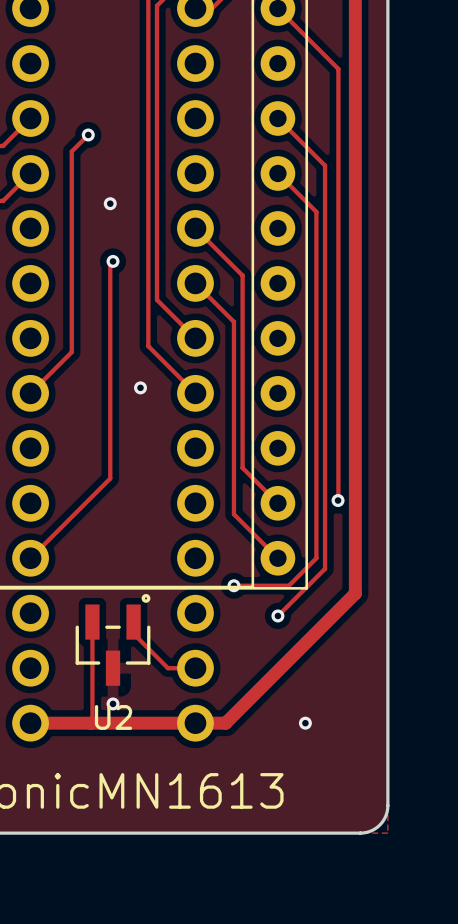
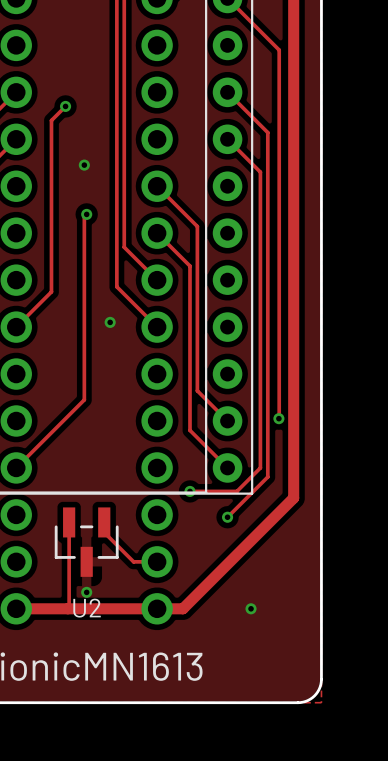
U2 footprint: [75, 594, 151, 686] -> [54, 507, 119, 577]

